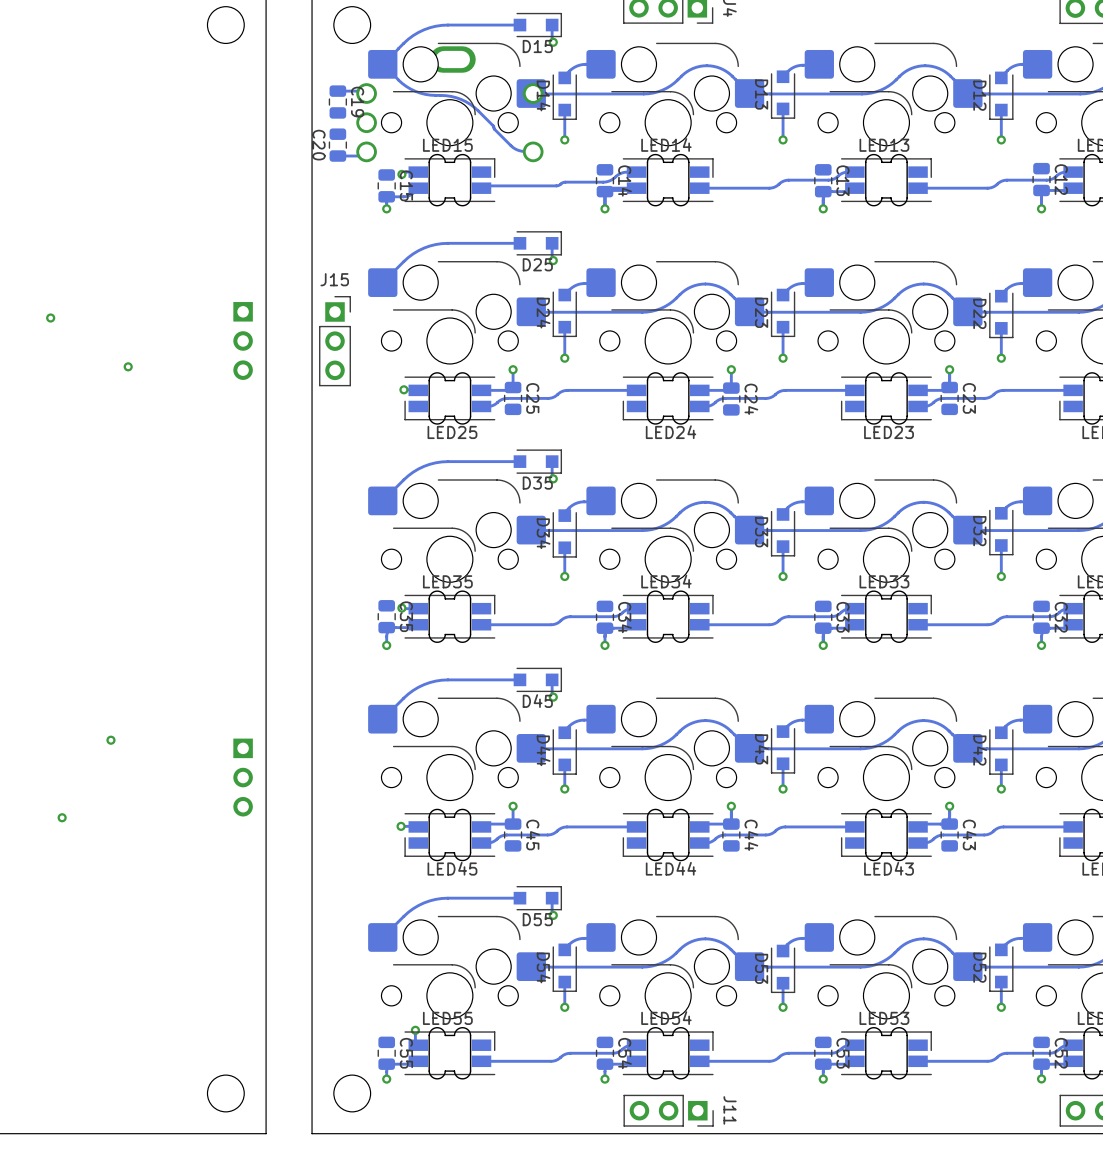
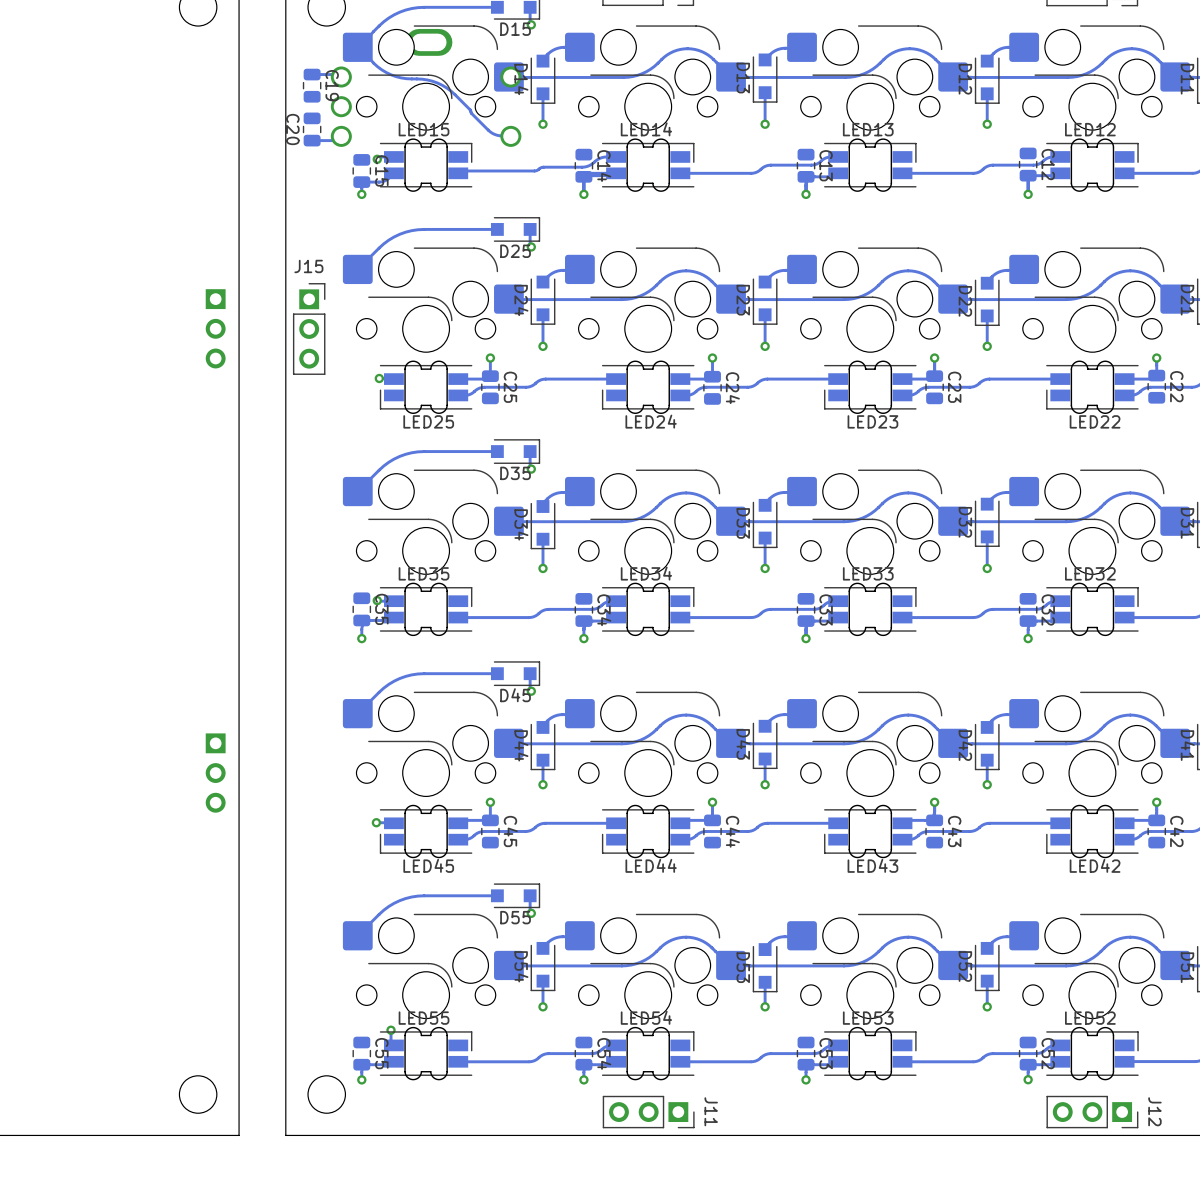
via: (50, 318) -> none
via: (128, 366) -> none
via: (110, 740) -> none
via: (62, 817) -> none

